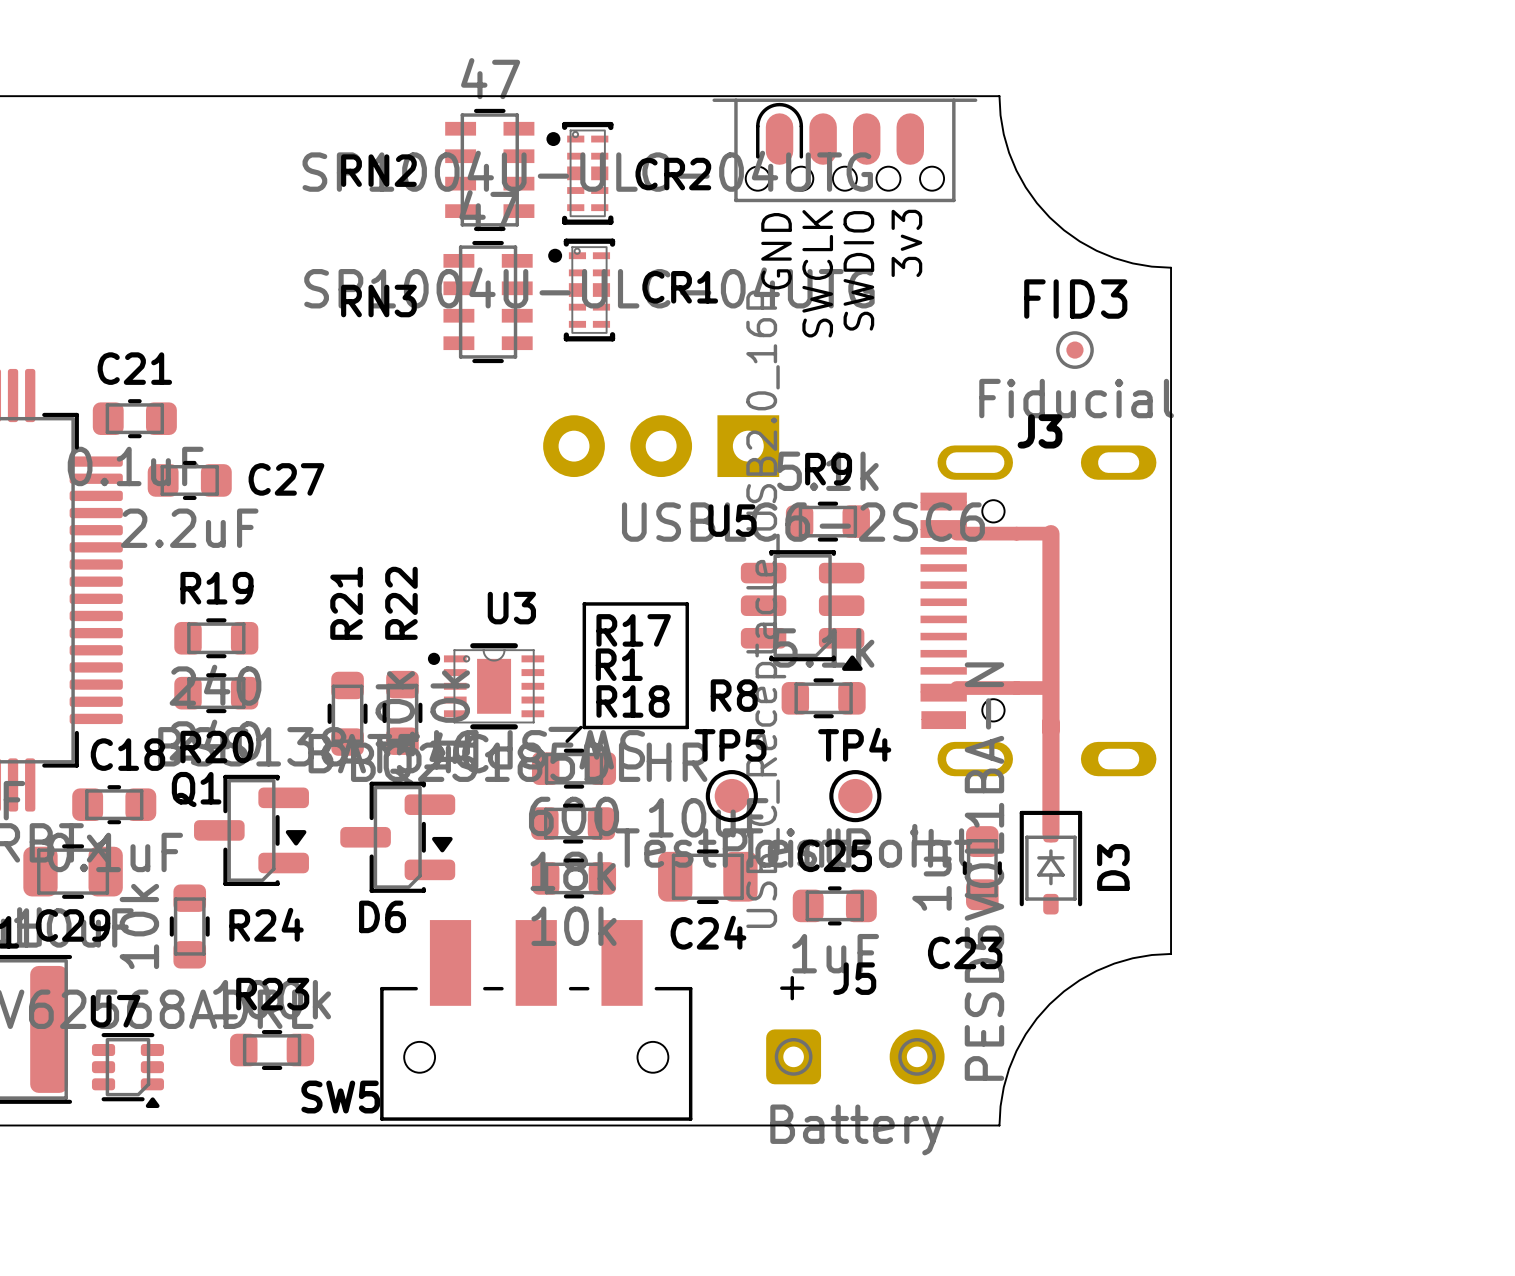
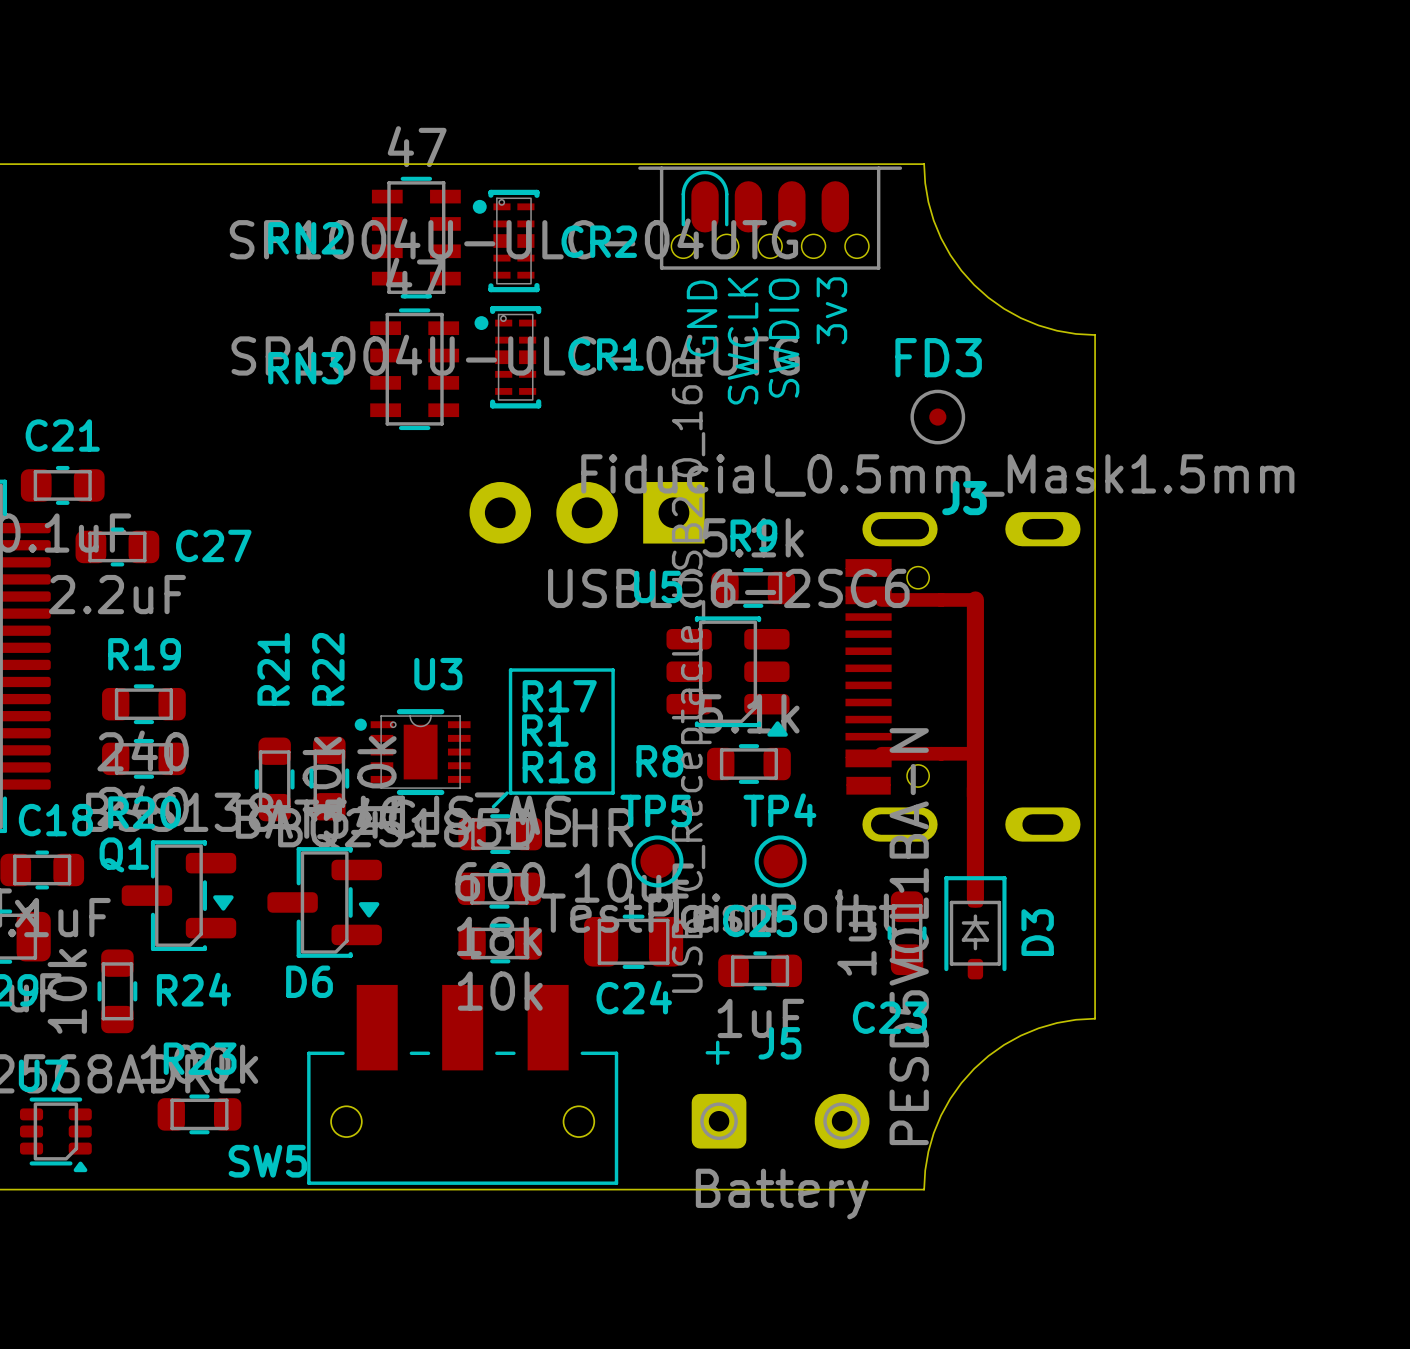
FD3: none -> Fiducial_0.5mm_Mask1.5mm (937, 417)
FID3: Fiducial (1074, 350) -> none

